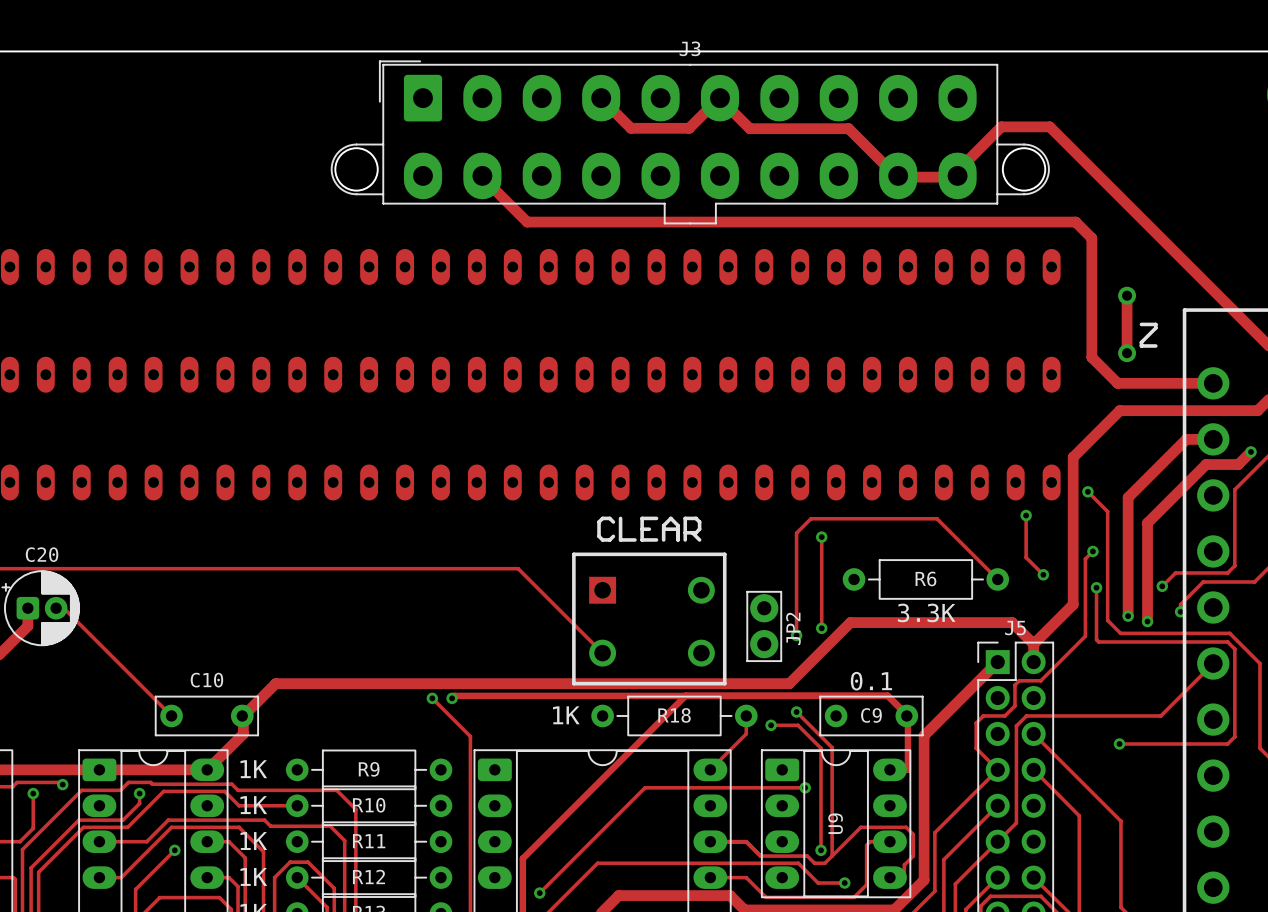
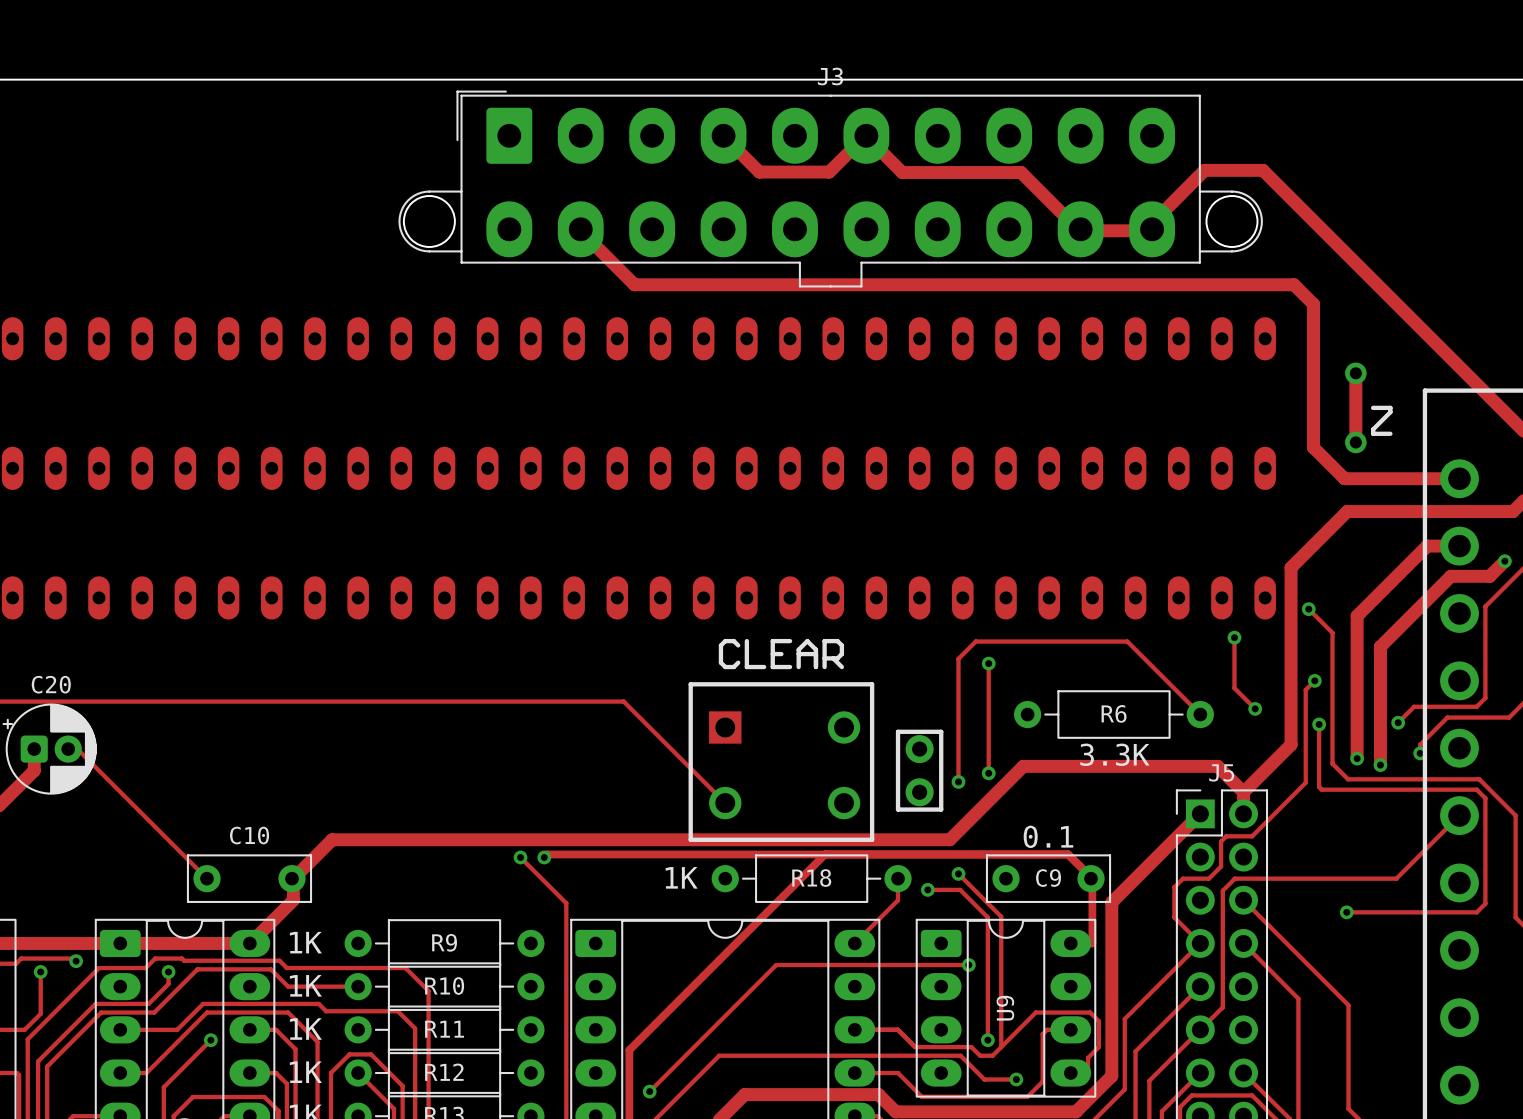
line: none -> (898, 731) (941, 731) (941, 809) (898, 809) (898, 731)
via: none -> (919, 749)
JP2: (764, 626) -> none
via: none -> (919, 792)

